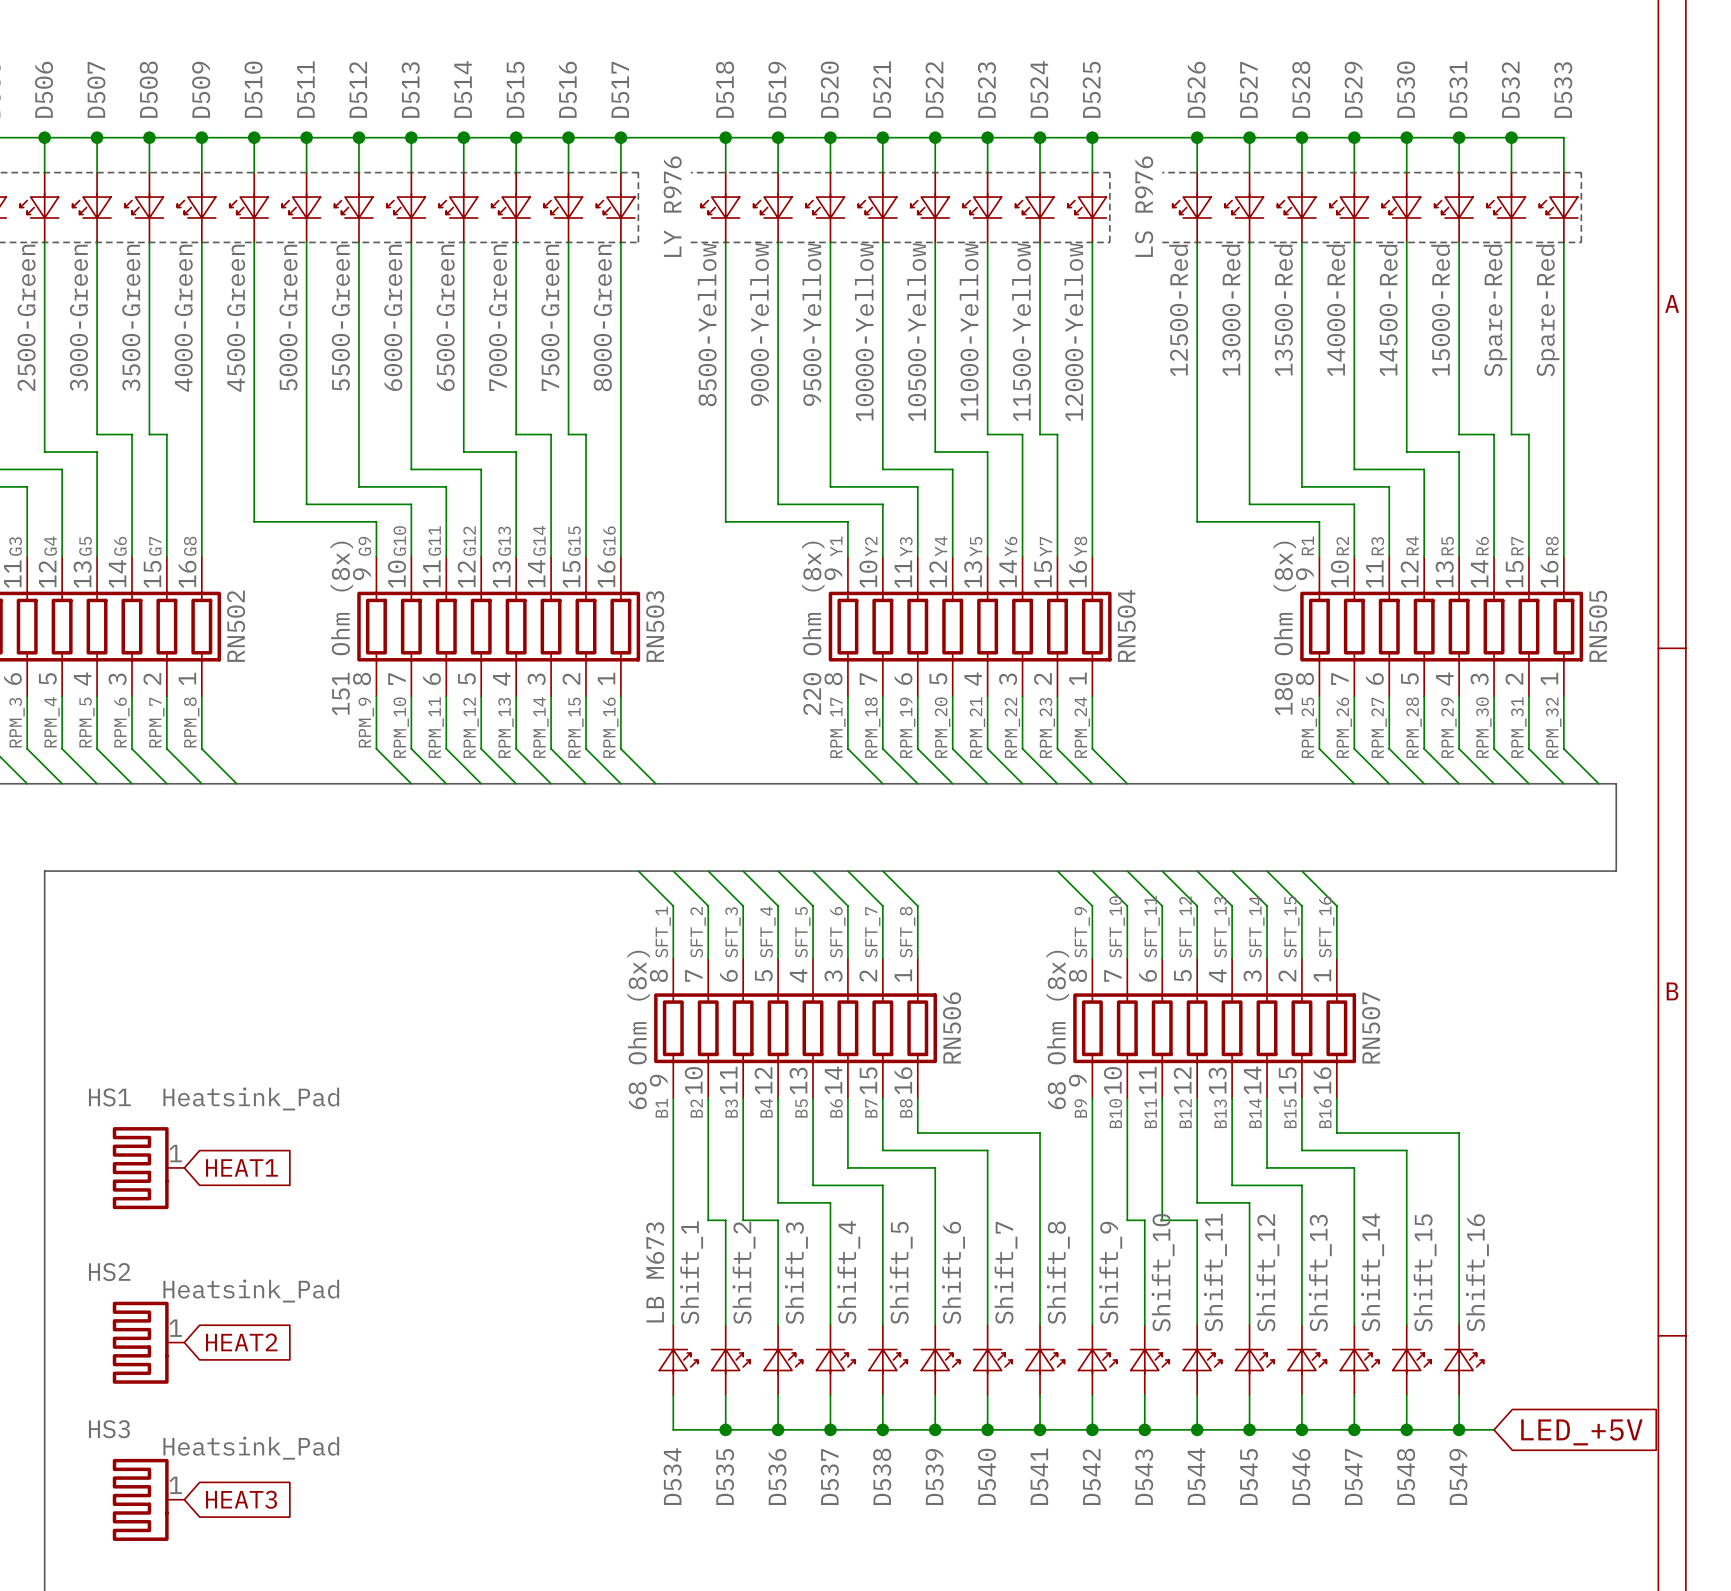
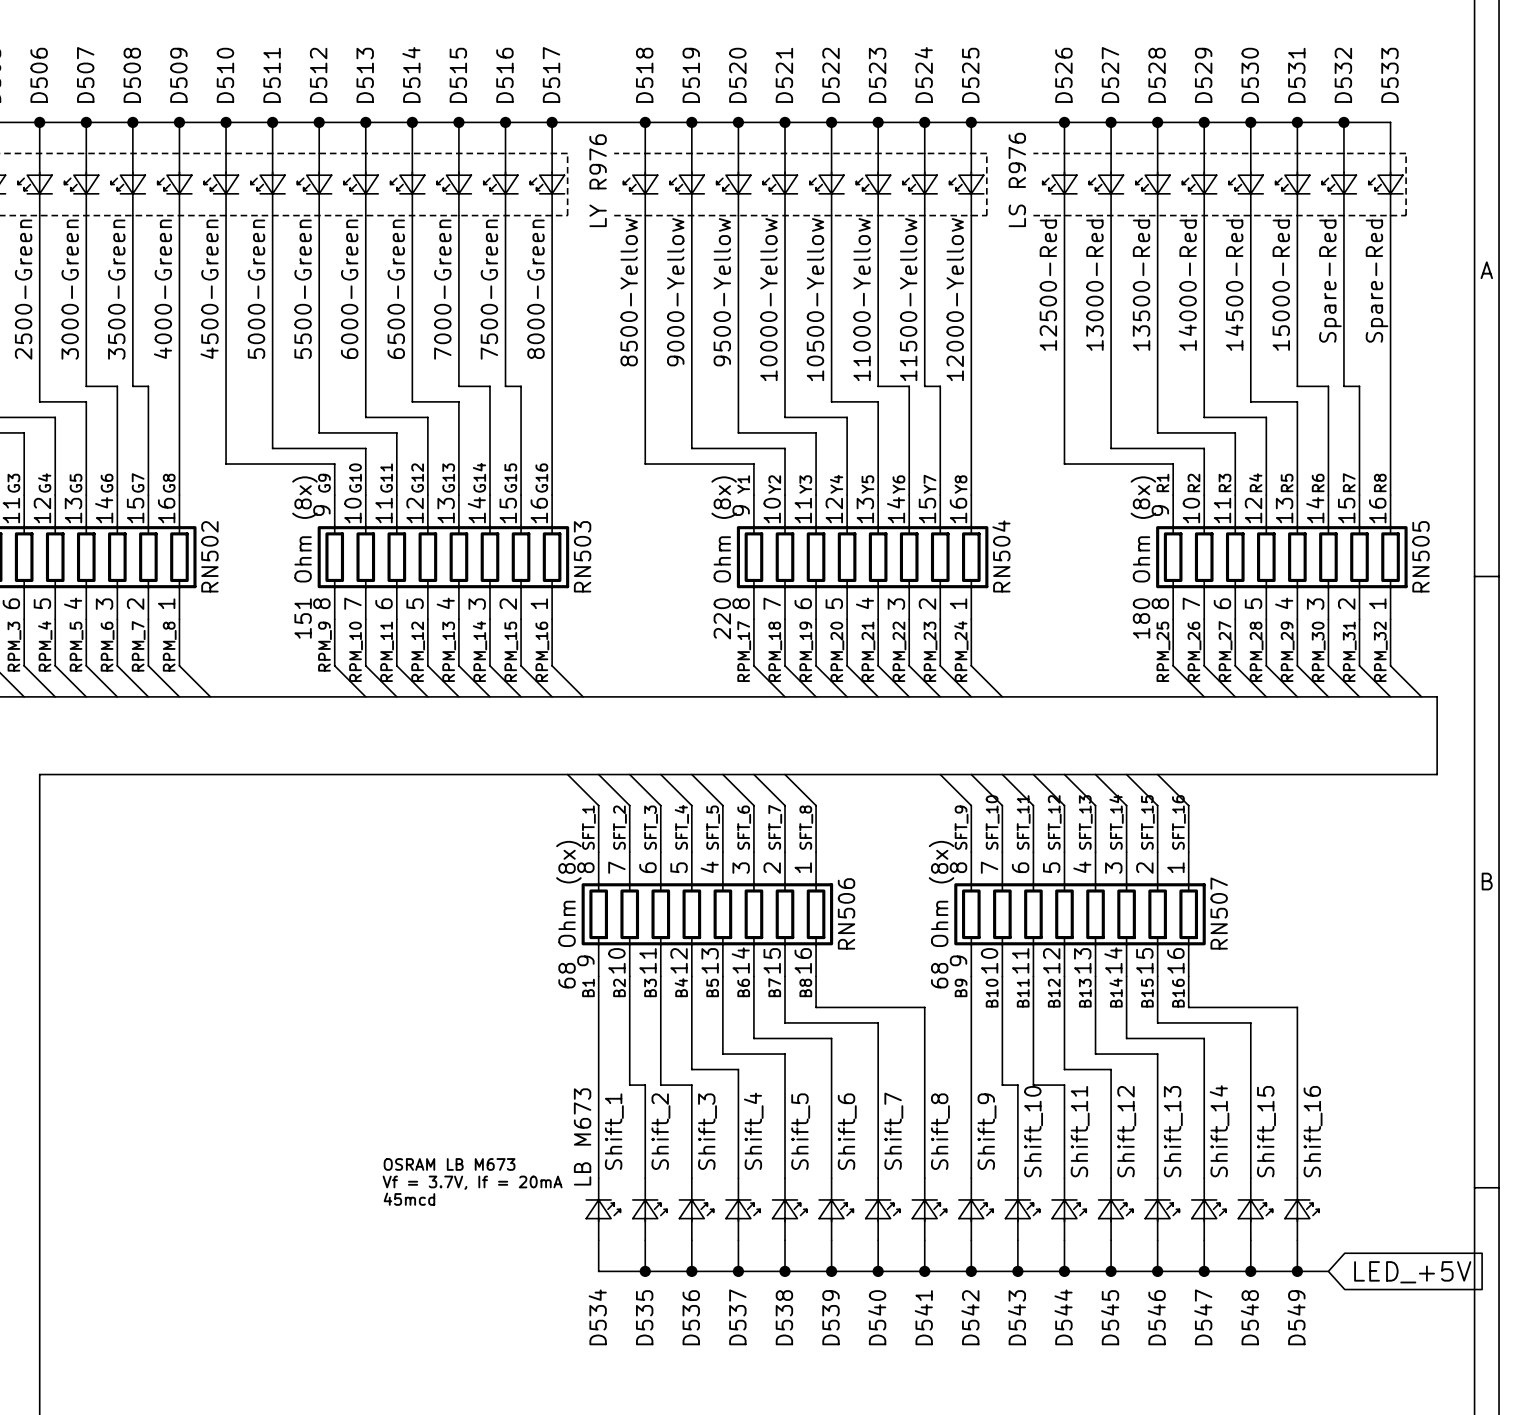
global label: HEAT1 (241, 1167) -> none
HS1: Heatsink_Pad (148, 1168) -> none
text: none -> OSRAM LB M673 (449, 1164)
text: none -> Vf = 3.7V, If = 20mA (472, 1182)
HS2: Heatsink_Pad (148, 1342) -> none
global label: HEAT2 (241, 1342) -> none
text: none -> 45mcd (409, 1199)
HS3: Heatsink_Pad (148, 1499) -> none
global label: HEAT3 (241, 1499) -> none

